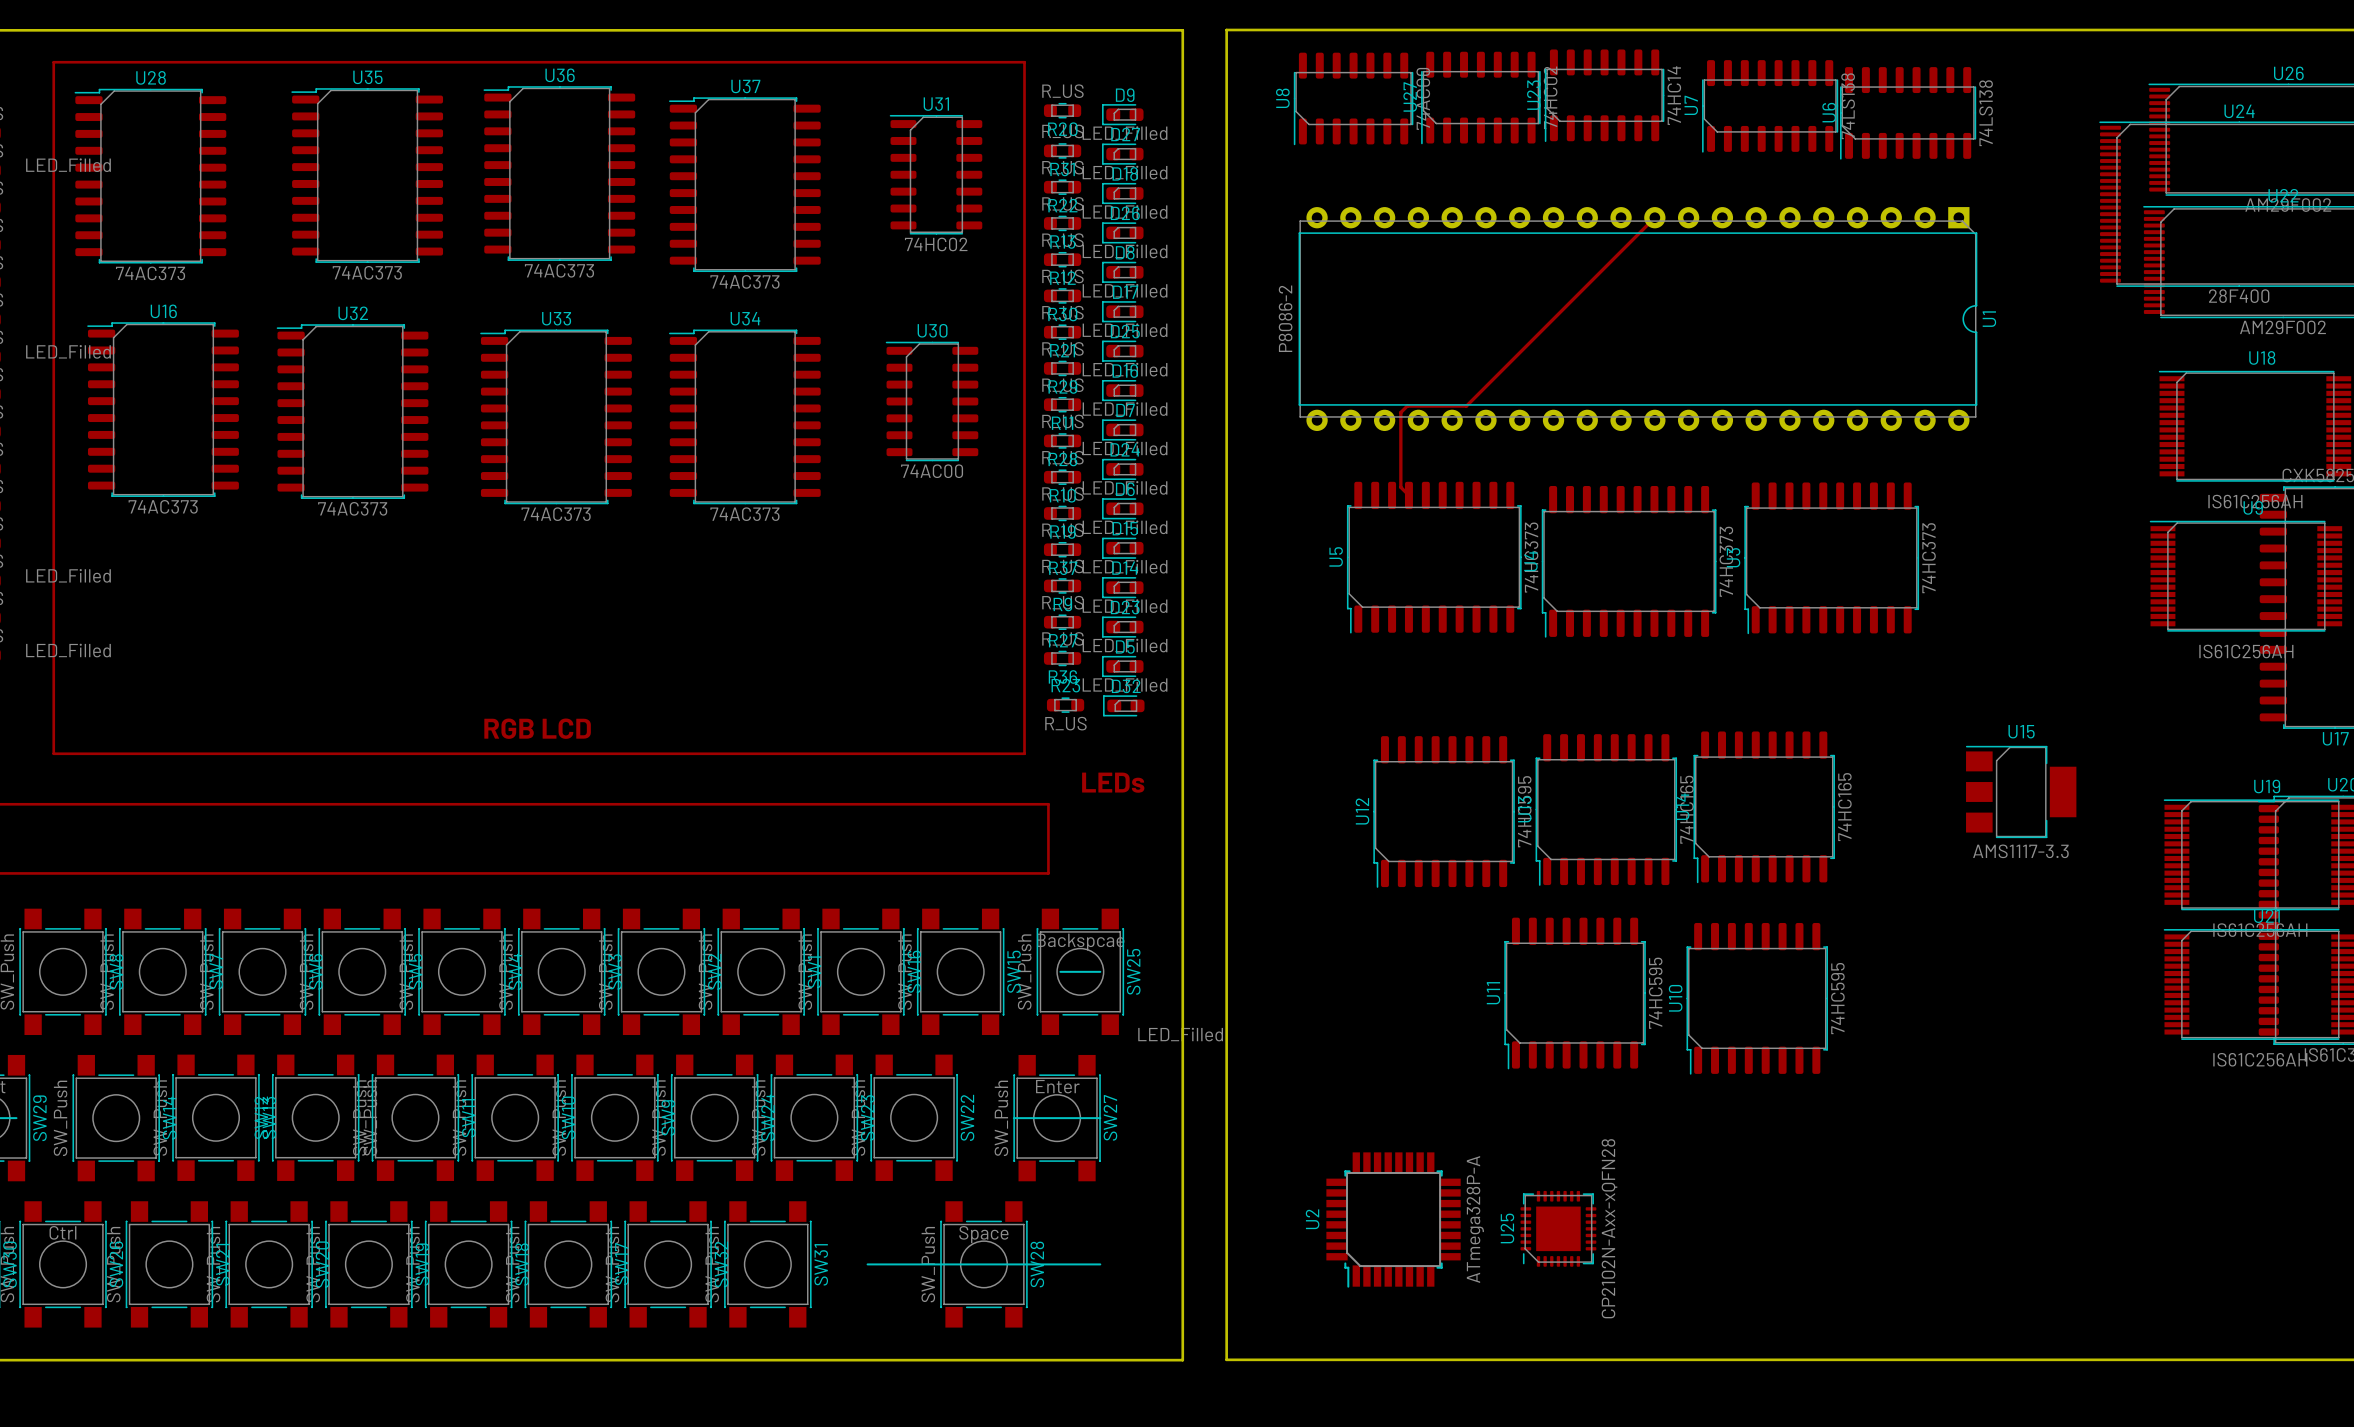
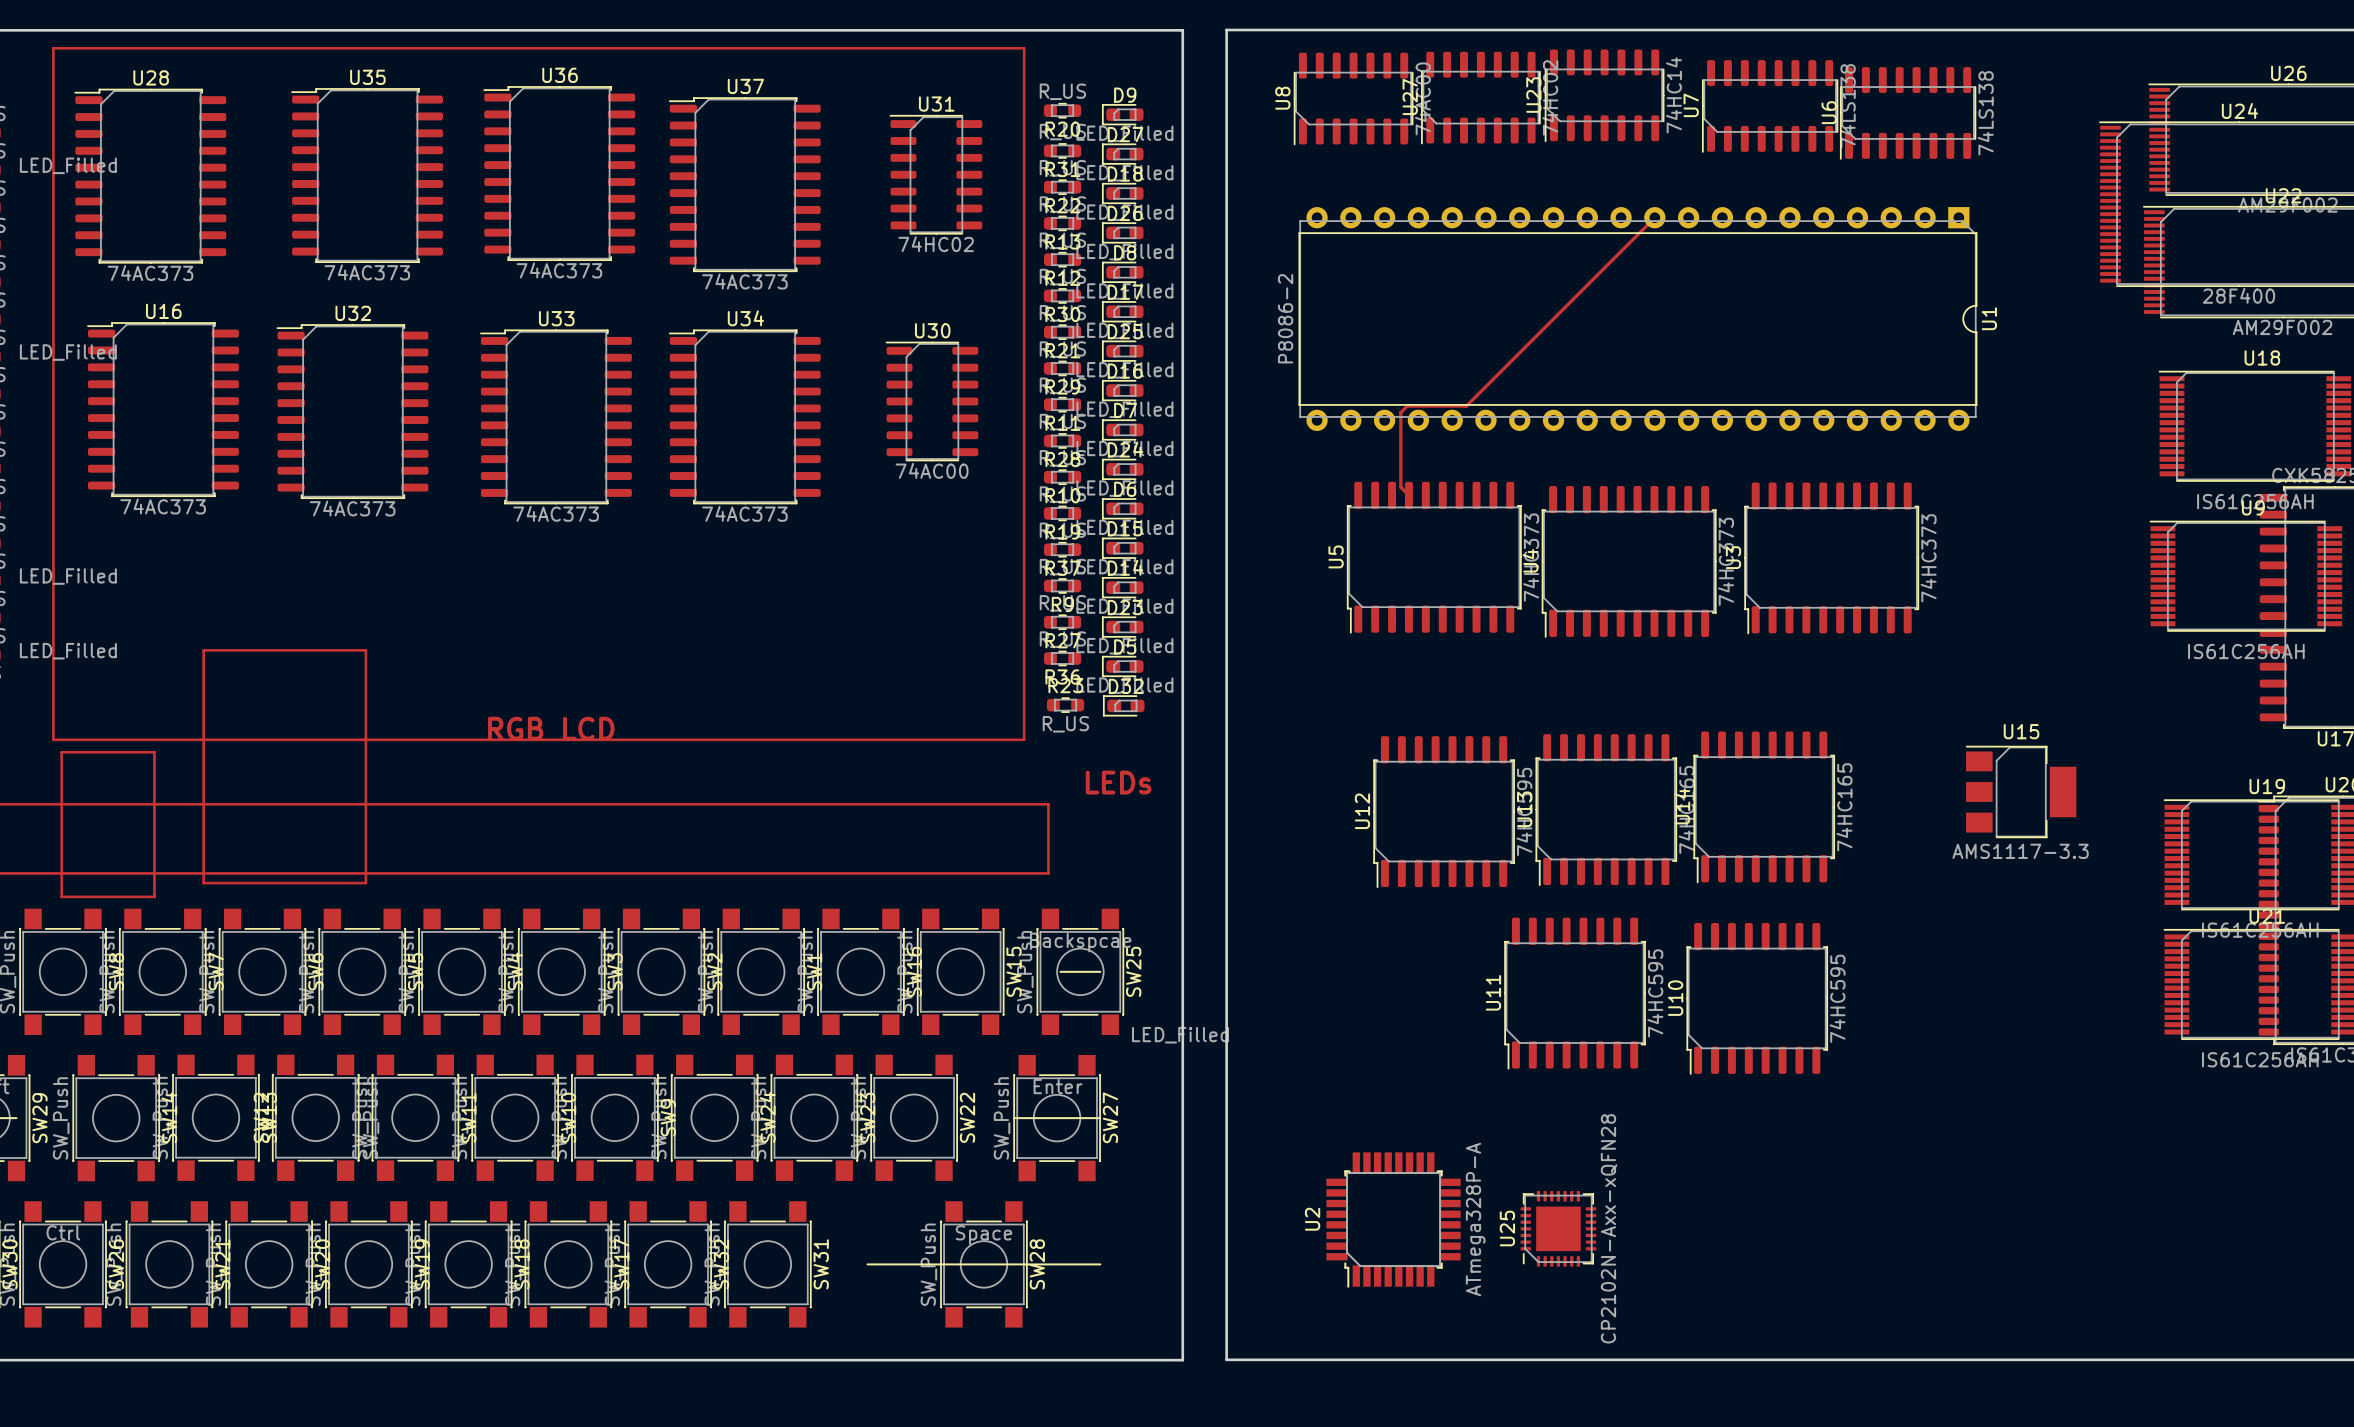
track: (53, 62) (1024, 62) (1024, 753) (53, 753) (53, 62) -> (53, 48) (1024, 48) (1024, 739) (53, 739) (53, 48)
track: none -> (203, 650) (203, 883) (365, 883) (365, 650) (203, 650)
track: none -> (61, 752) (154, 752) (154, 896) (61, 896) (61, 752)

